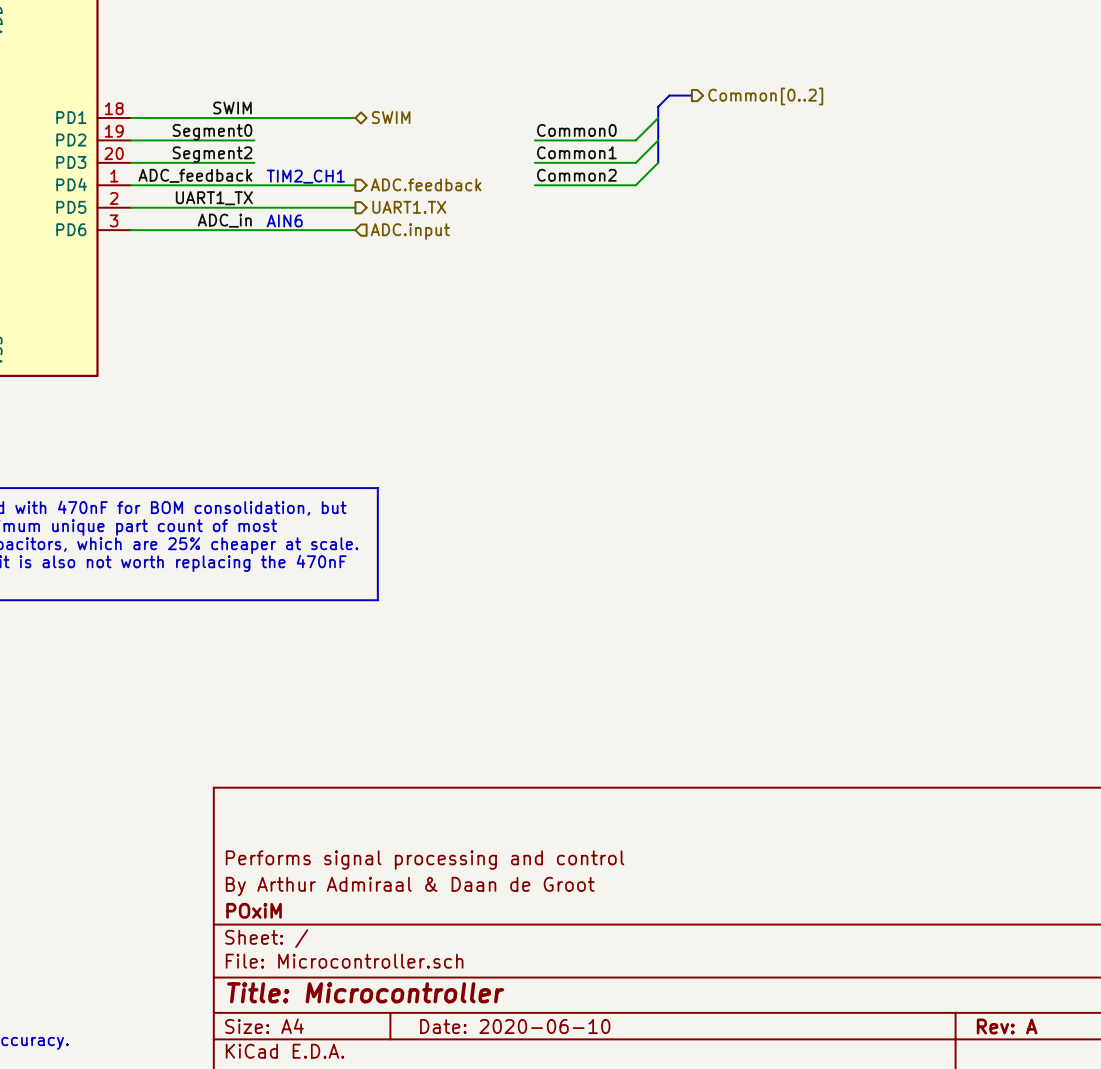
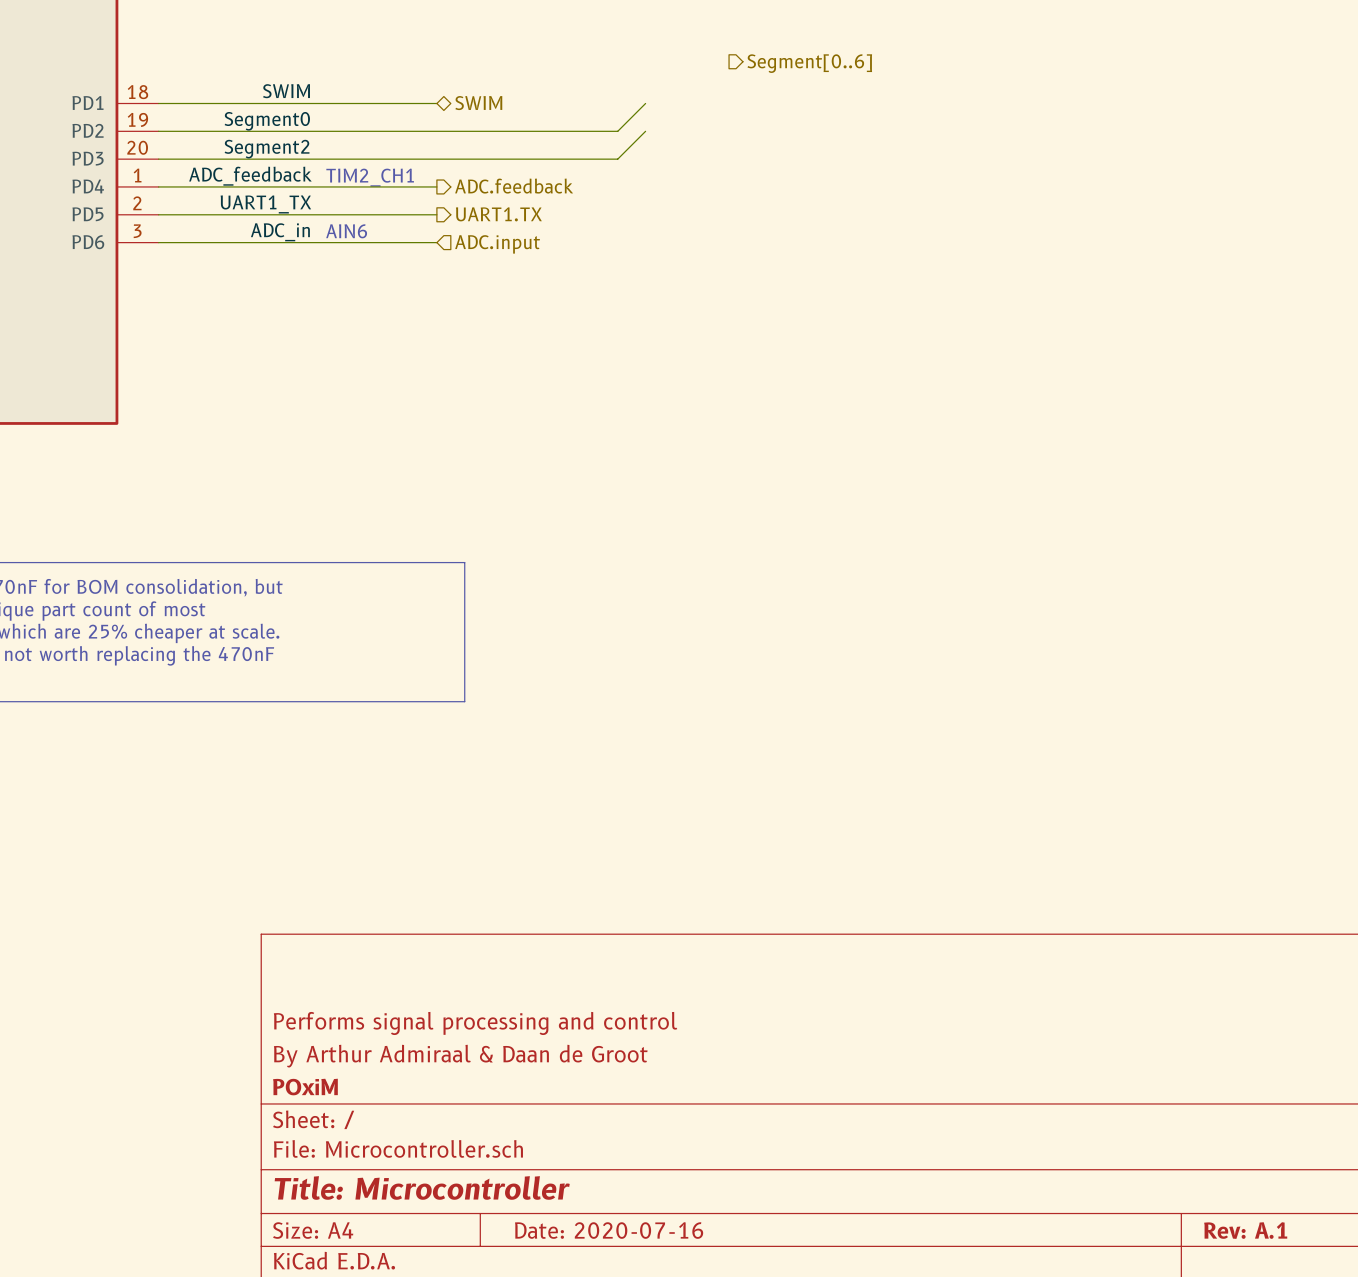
hierarchical label: none -> Segment[0..6] (809, 63)
bus: (691, 95) (669, 95) (658, 106) (658, 162) -> none
hierarchical label: Common[0..2] (765, 96) -> none
wire: none -> (645, 103) (617, 131) (311, 131)
wire: (658, 117) (635, 140) (534, 140) -> none
label: Common0 (576, 130) -> none
wire: none -> (645, 131) (617, 159) (311, 159)
wire: (658, 140) (635, 162) (534, 162) -> none
label: Common1 (576, 152) -> none
wire: (658, 162) (635, 185) (534, 185) -> none
label: Common2 (576, 175) -> none
title block: Date: 2020-06-10 (515, 1026) -> Date: 2020-07-16 (609, 1230)
title block: Rev: A (1007, 1026) -> Rev: A.1 (1245, 1230)

